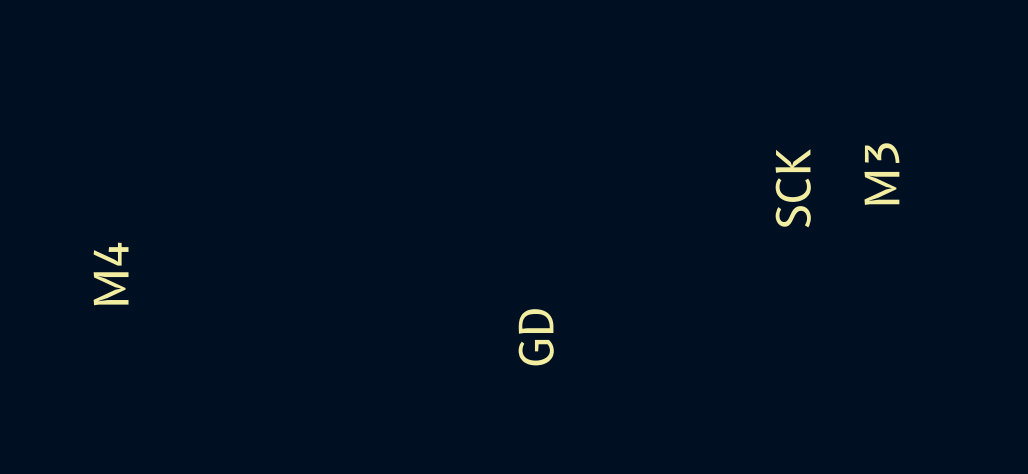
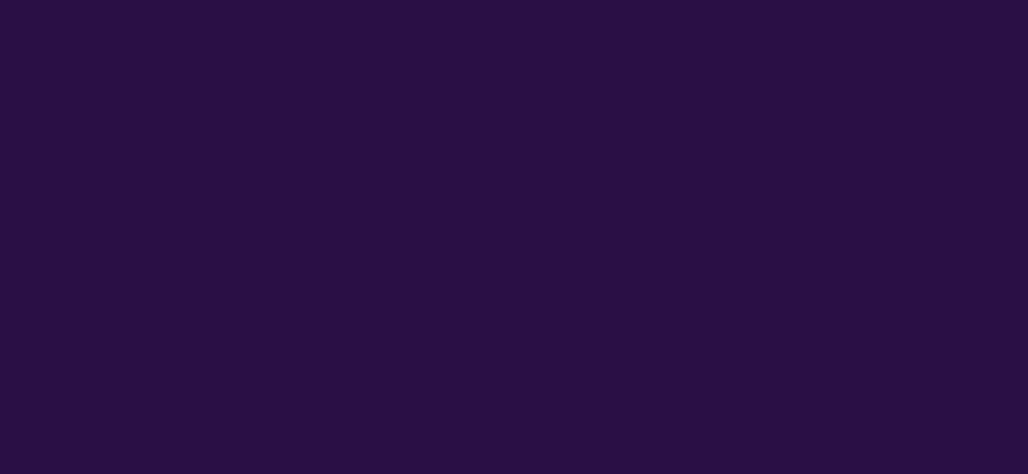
text: M3 (881, 174) -> none
text: SCK (793, 188) -> none
text: M4 (111, 273) -> none
text: GD (536, 337) -> none

